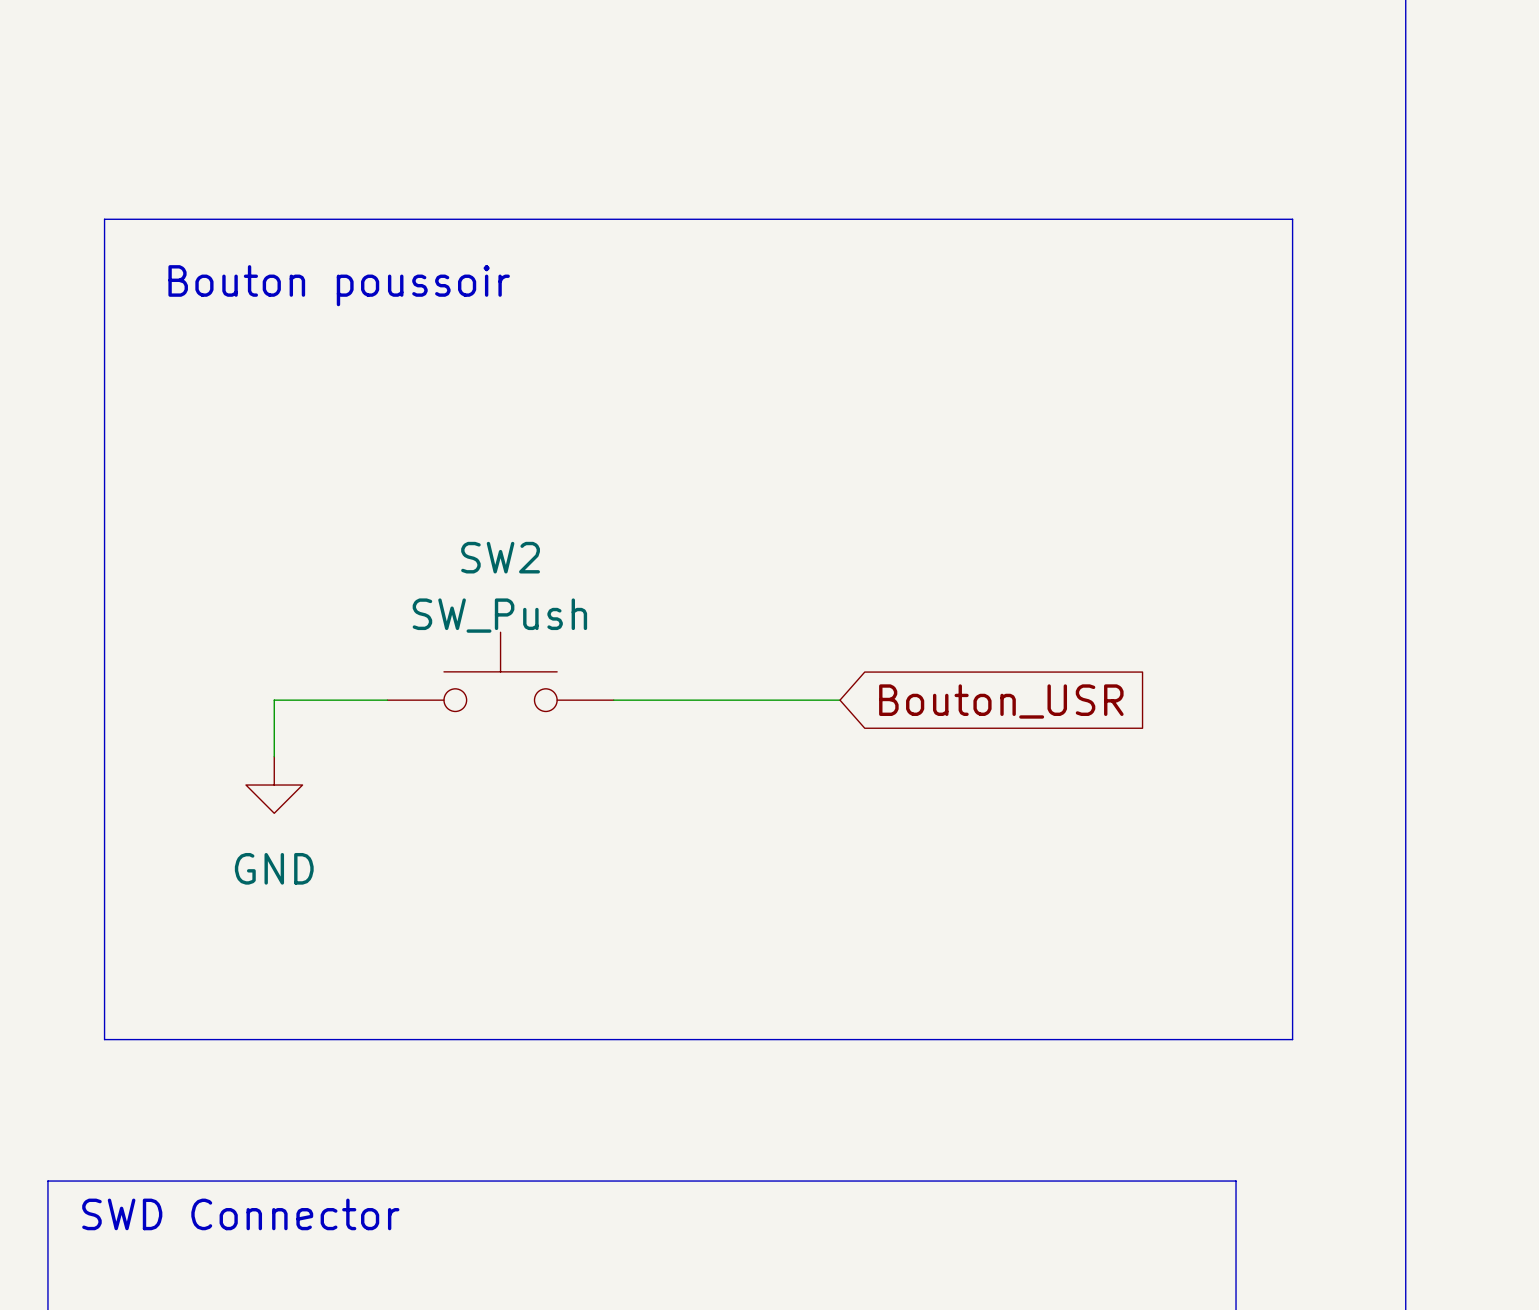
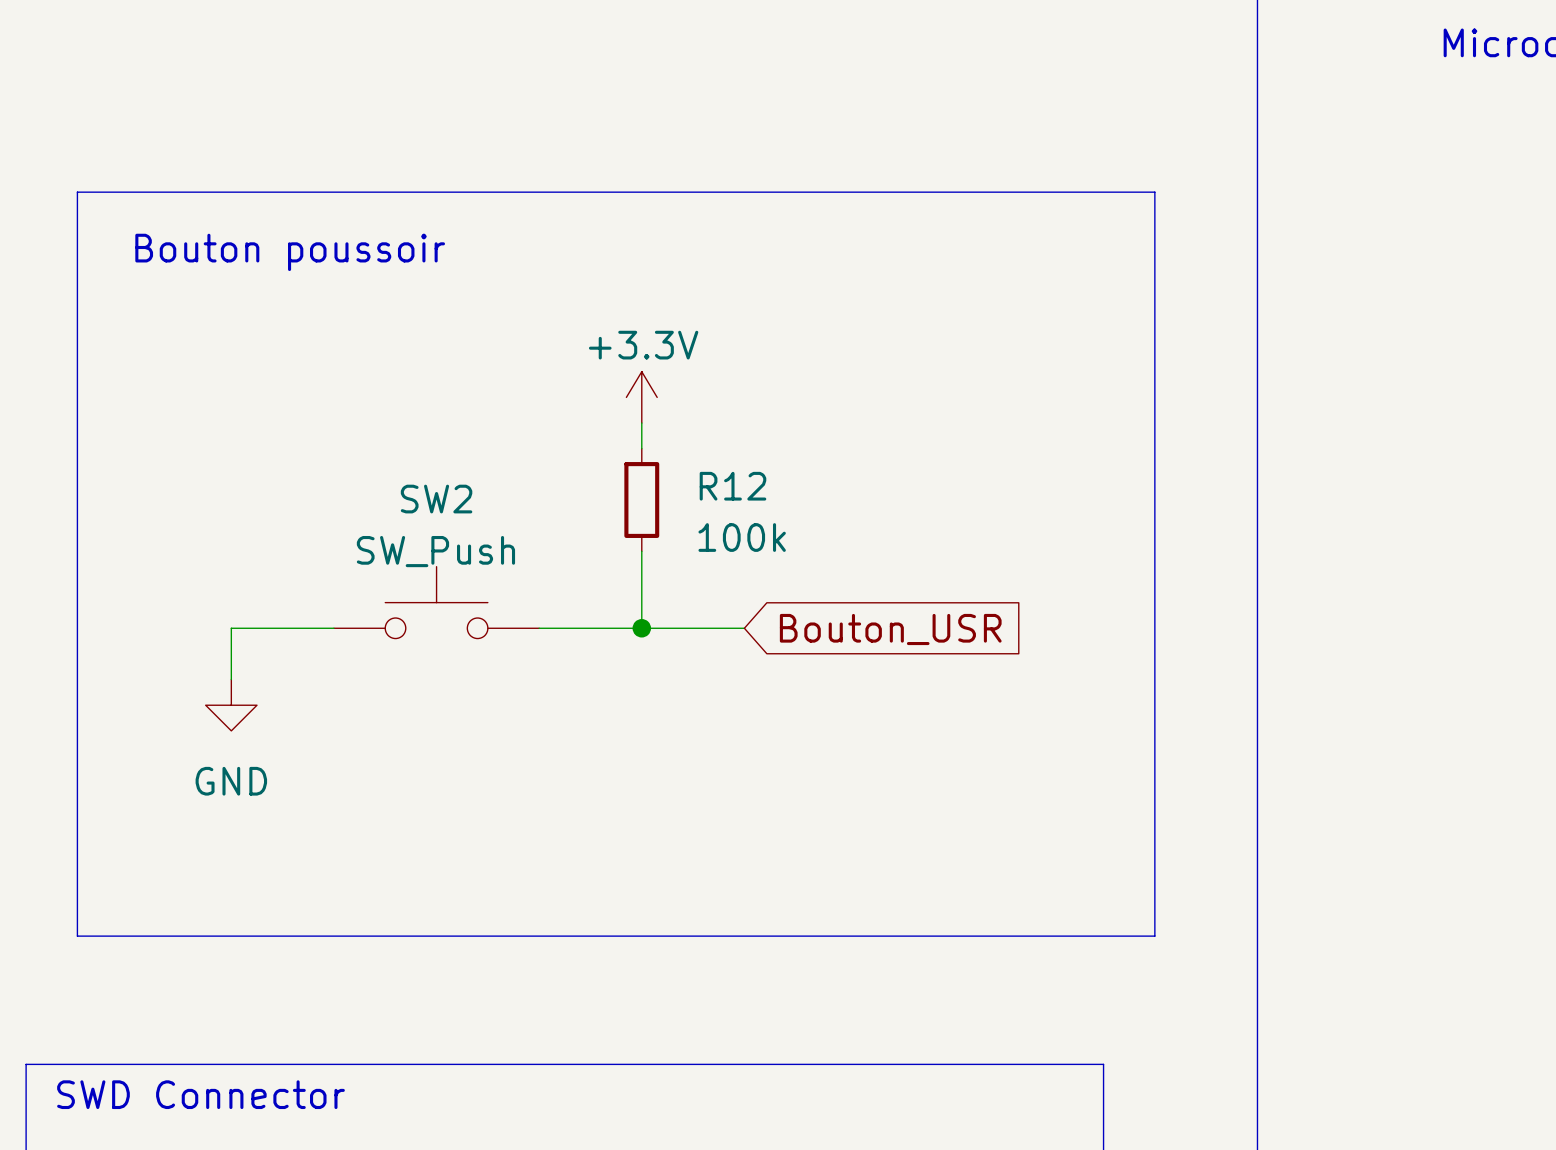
power symbol: none -> +3.3V (641, 397)
wire: none -> (641, 423) (641, 448)
R12: none -> 100k (641, 500)
wire: none -> (641, 551) (641, 628)
junction: none -> (641, 628)

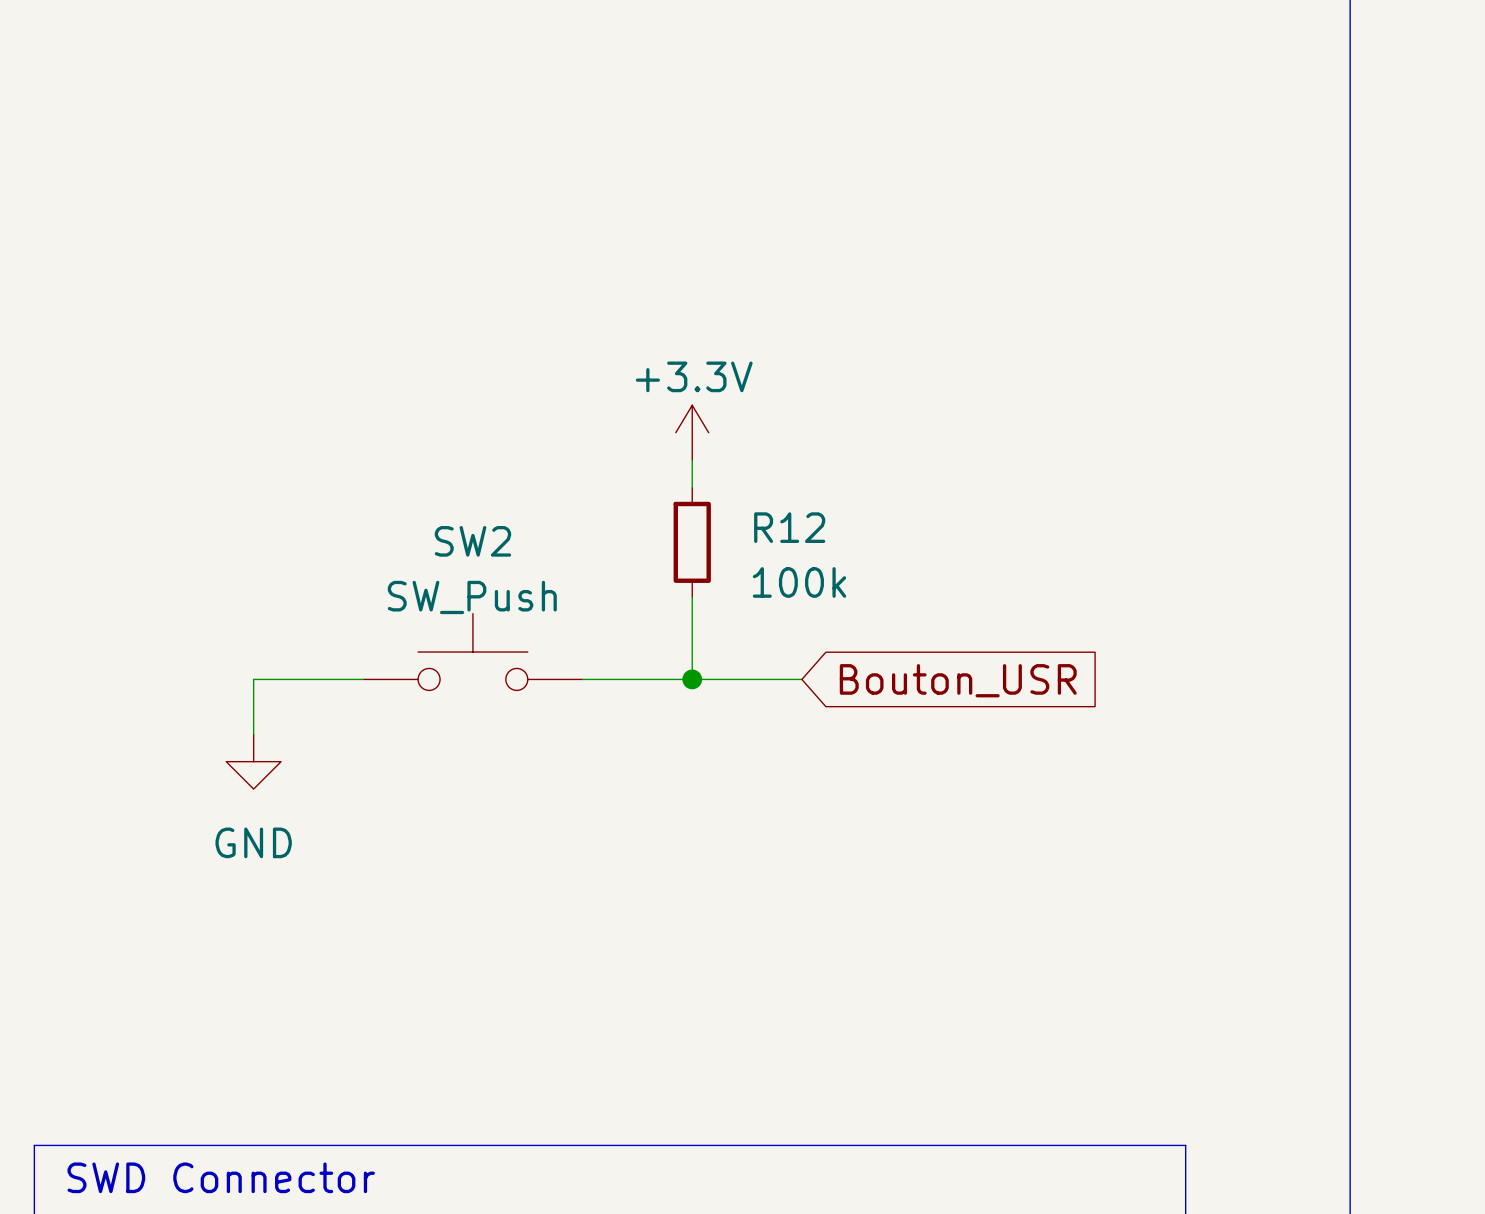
line: (77, 192) (1154, 192) (1154, 936) (77, 936) (77, 192) -> none
text: Bouton poussoir (290, 252) -> none

